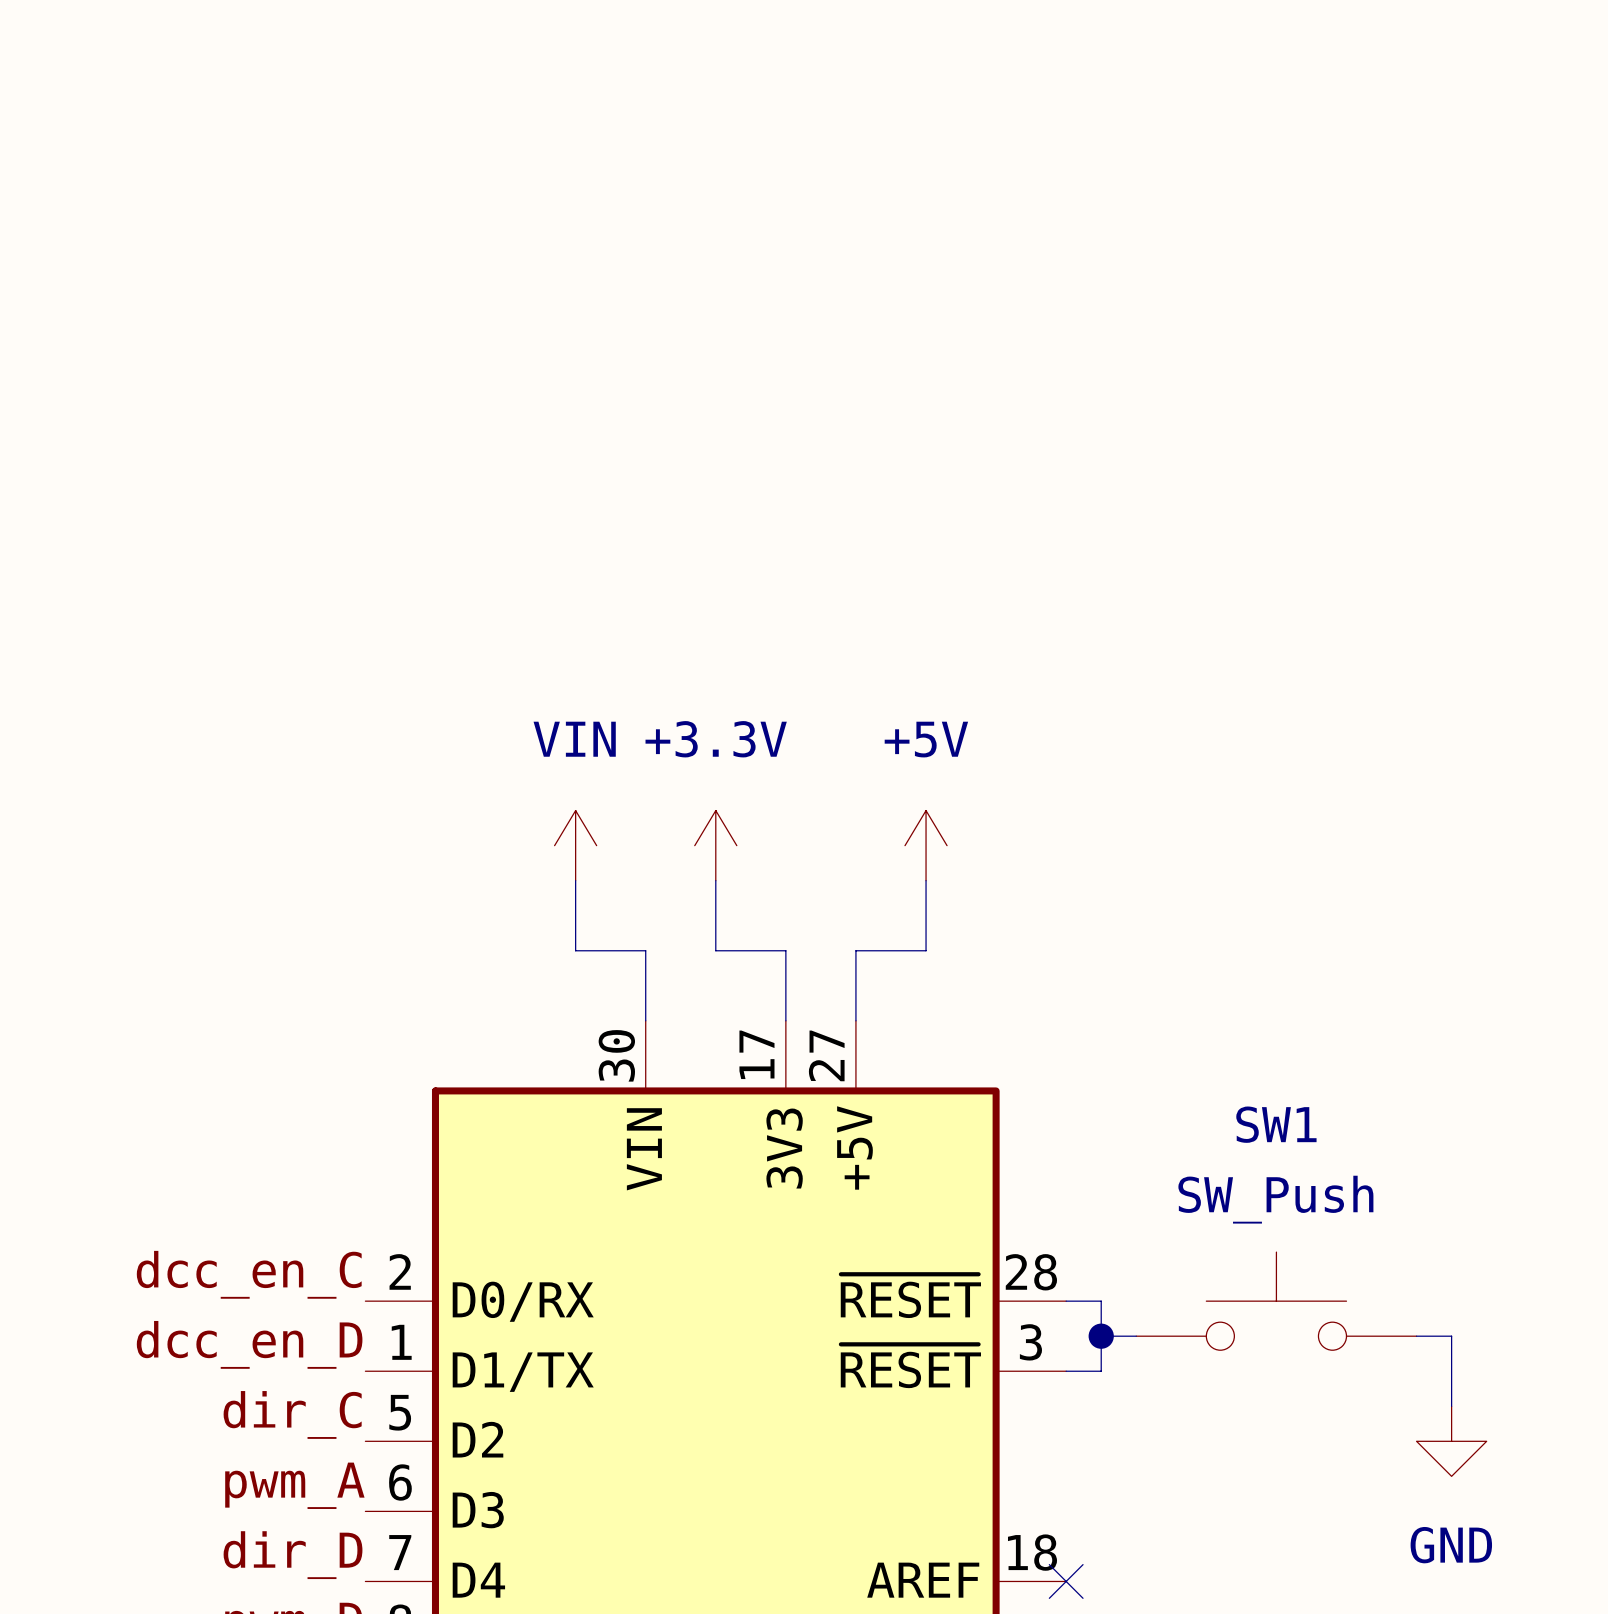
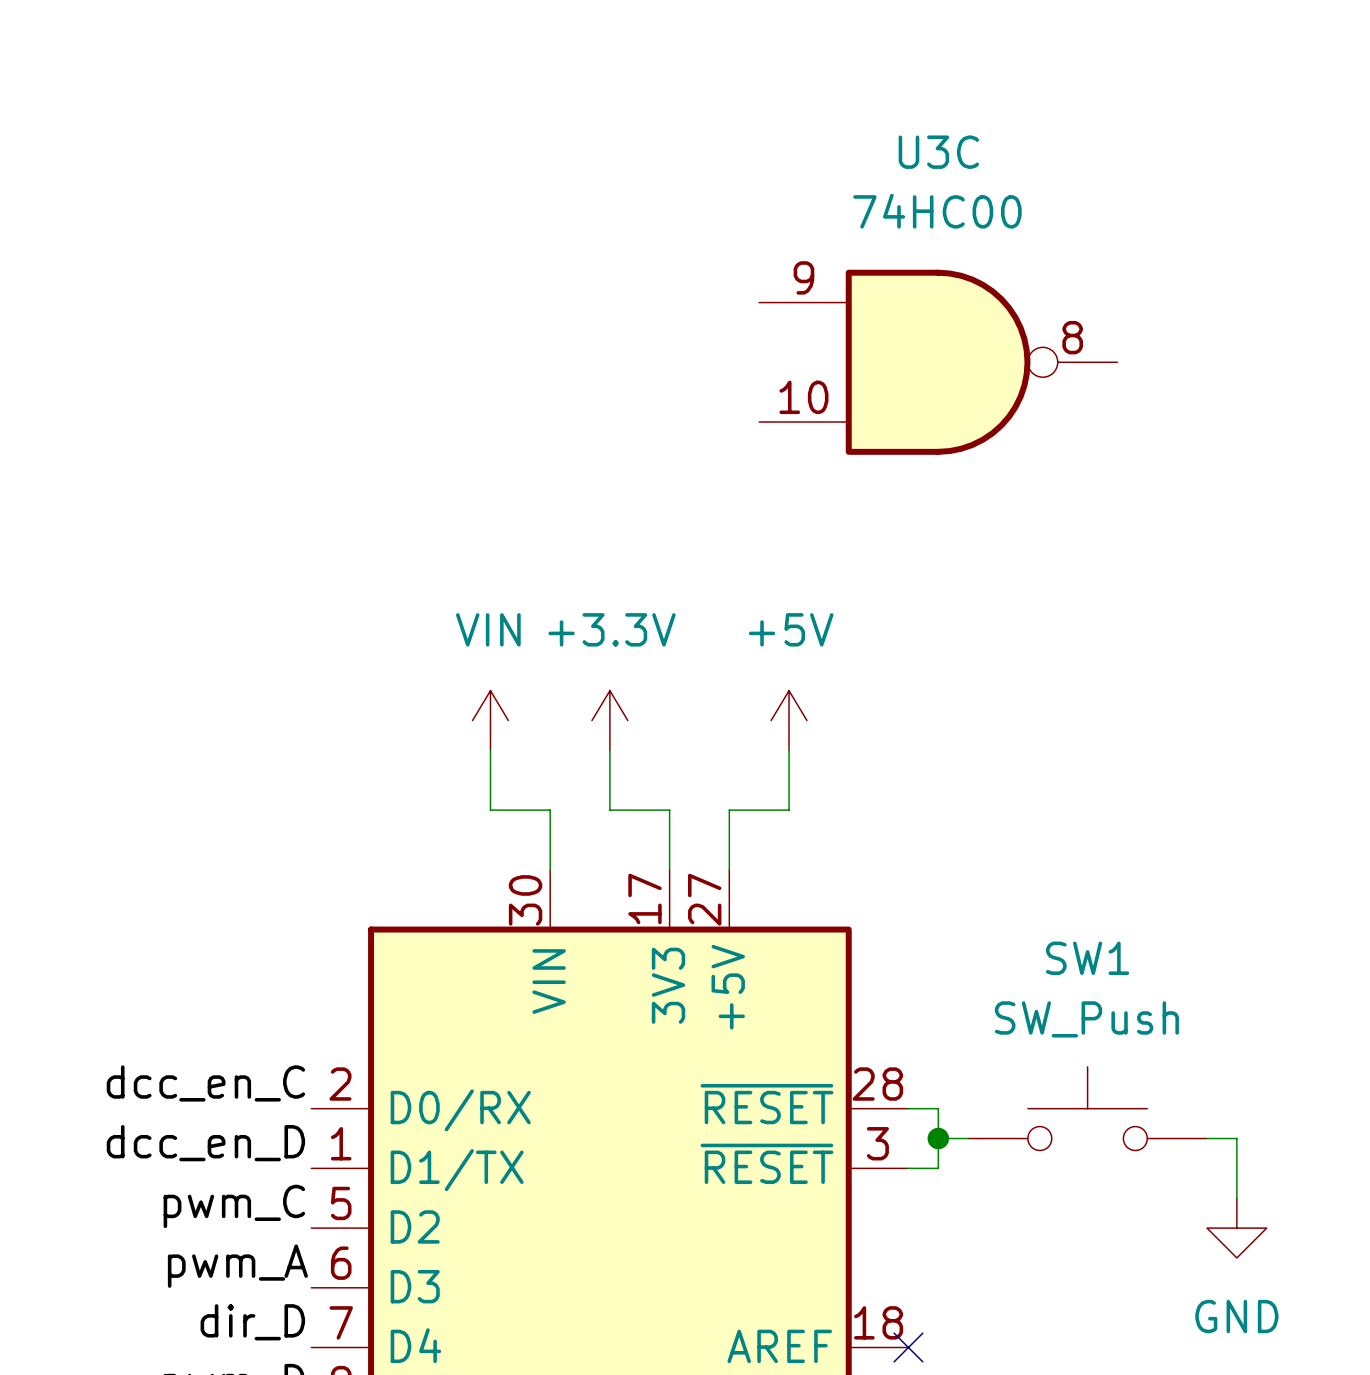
U3C: none -> 74HC00 (938, 362)
label: dir_C (292, 1414) -> pwm_C (234, 1206)

